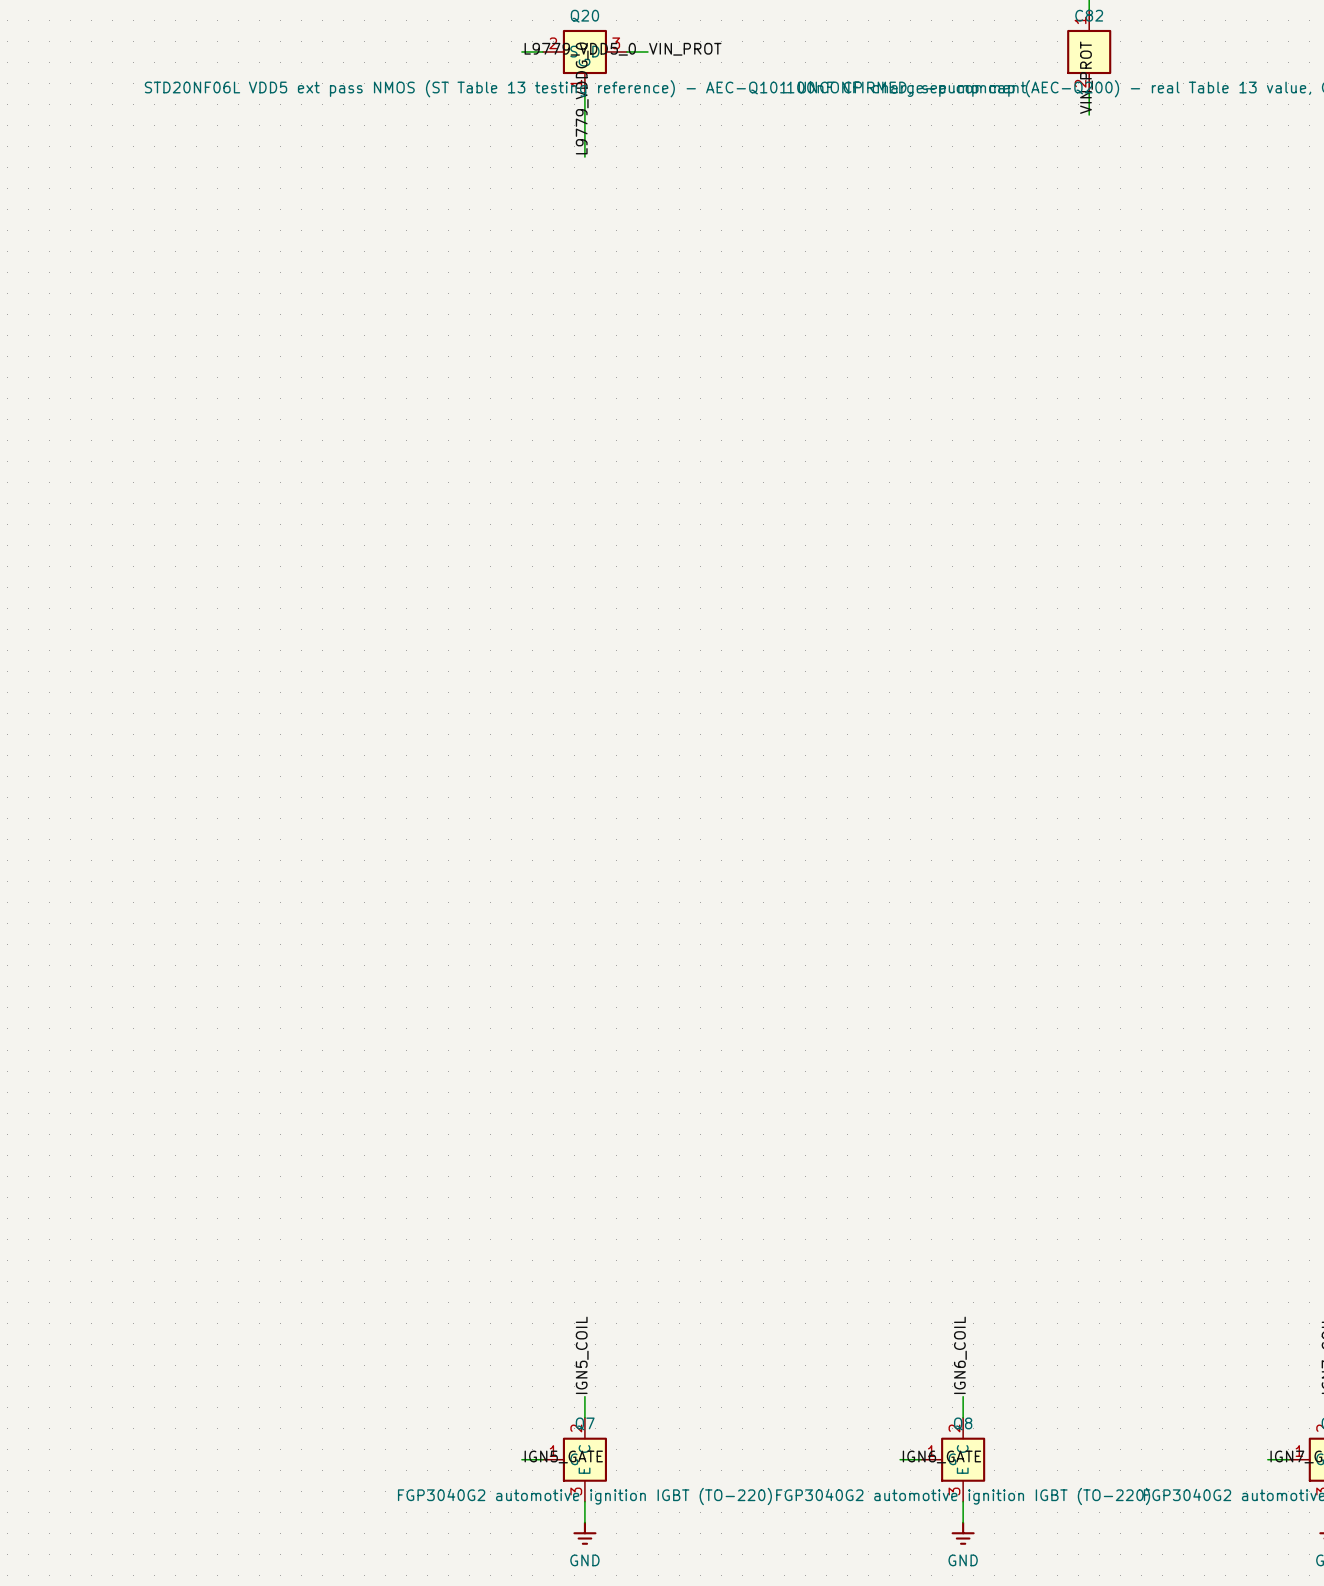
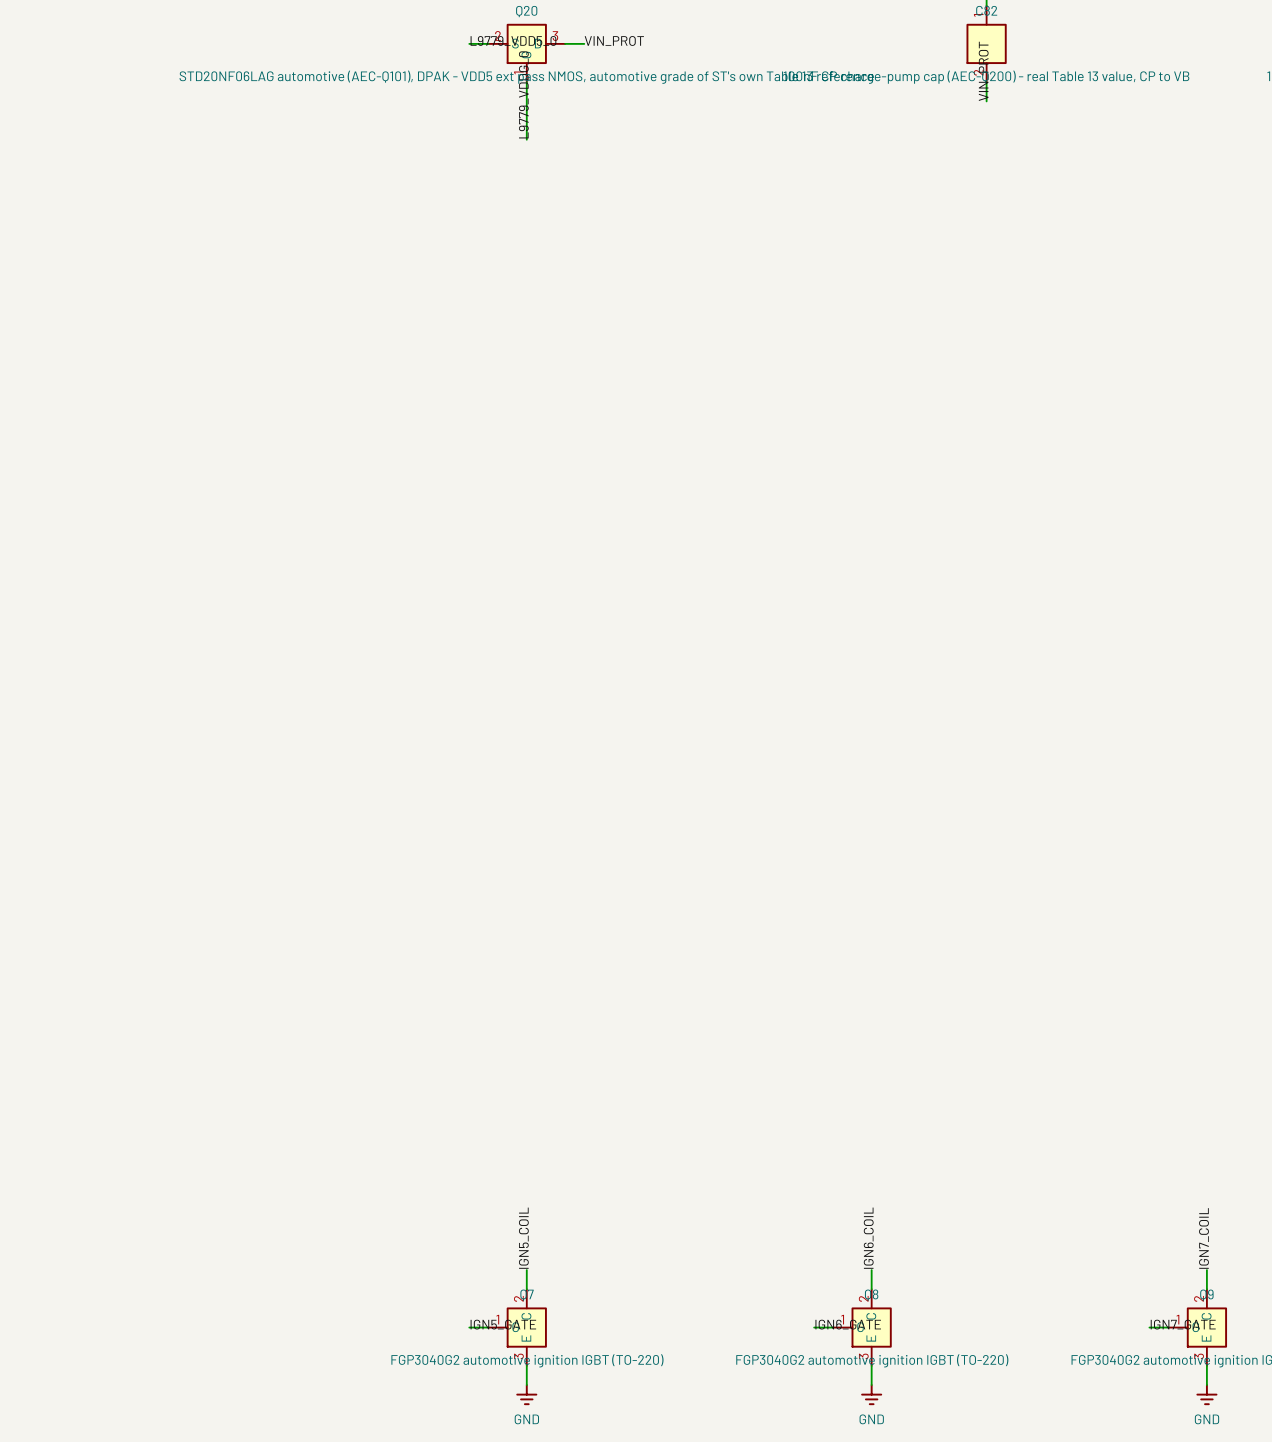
Q20 value: STD20NF06L VDD5 ext pass NMOS (ST Table 13 testing reference) - AEC-Q101 UNCONFIRMED, see comment (585, 88) -> STD20NF06LAG automotive (AEC-Q101), DPAK - VDD5 ext pass NMOS, automotive grade of ST's own Table 13 reference (526, 77)

